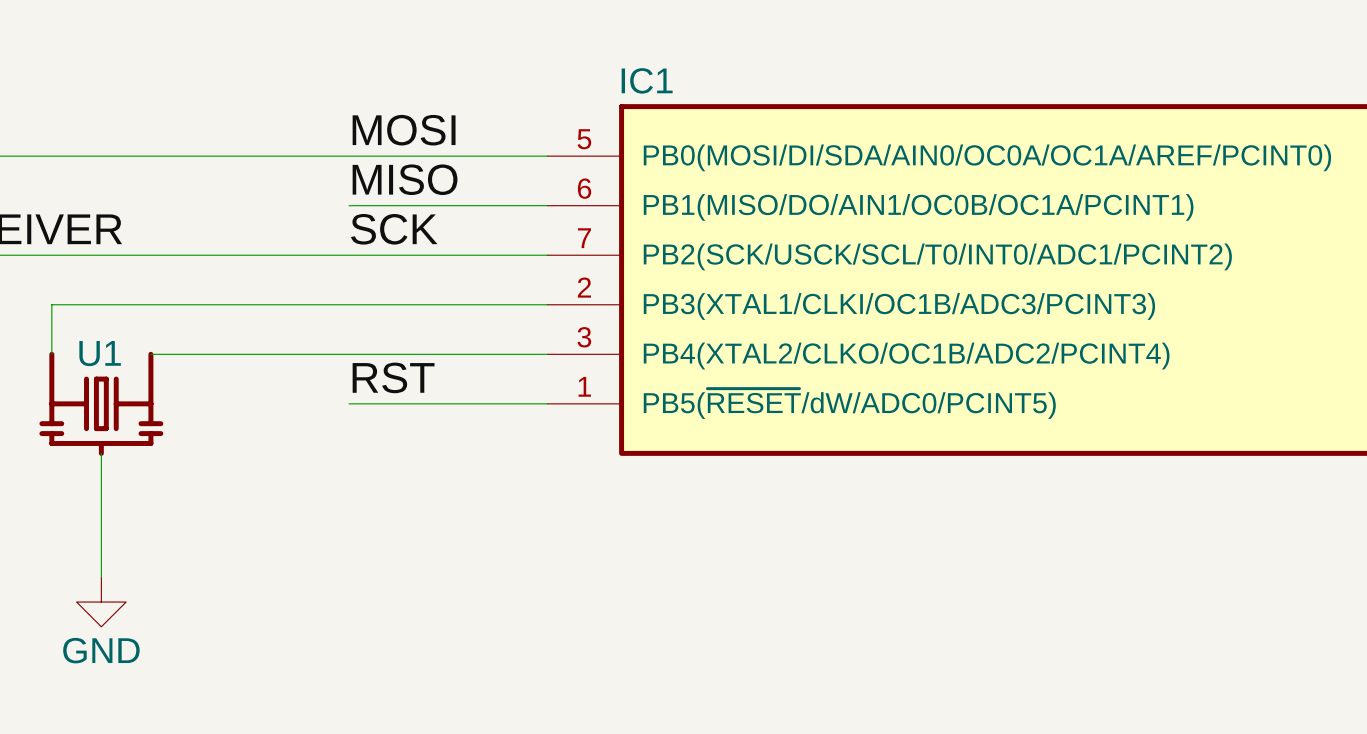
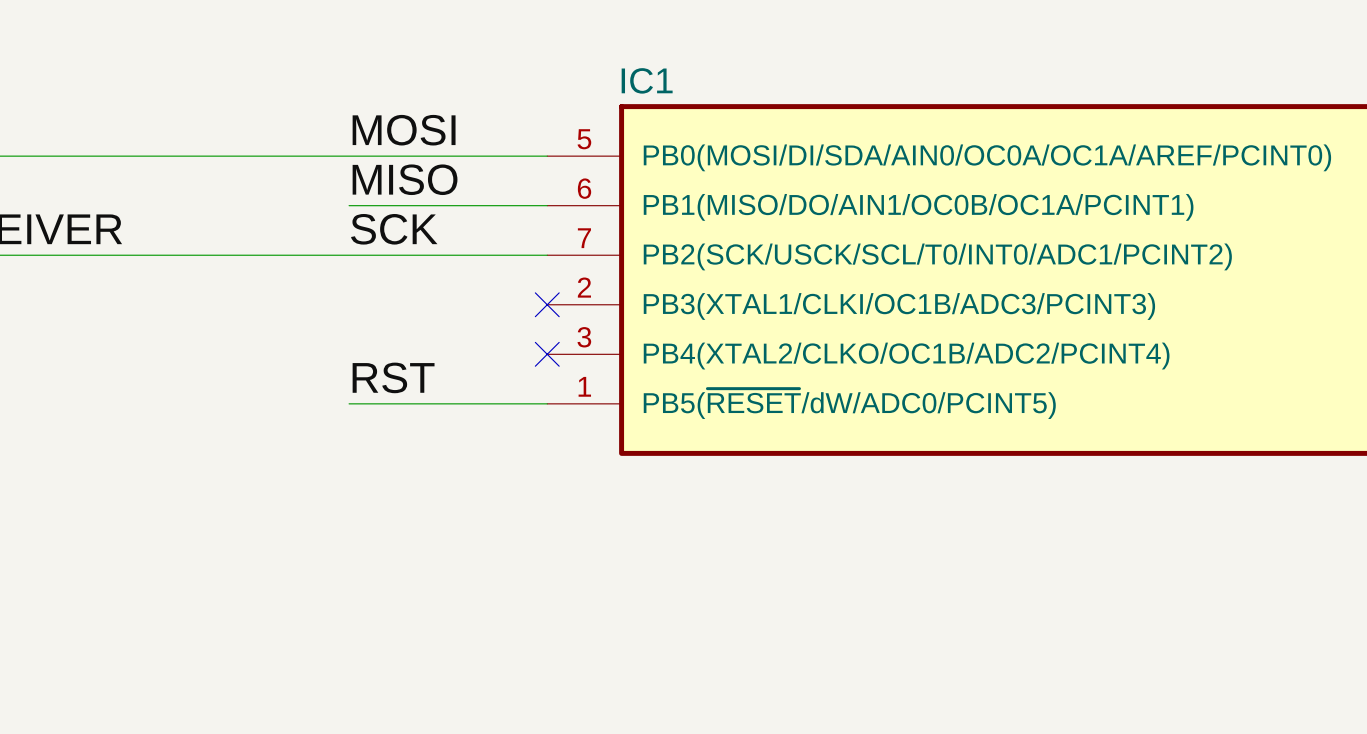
wire: (547, 304) (51, 304) (51, 354) -> none
no-connect mark: none -> (547, 304)
wire: (150, 354) (547, 354) -> none
no-connect mark: none -> (547, 354)
U1: (101, 403) -> none
wire: (101, 453) (101, 577) -> none
power symbol: GND (101, 602) -> none

